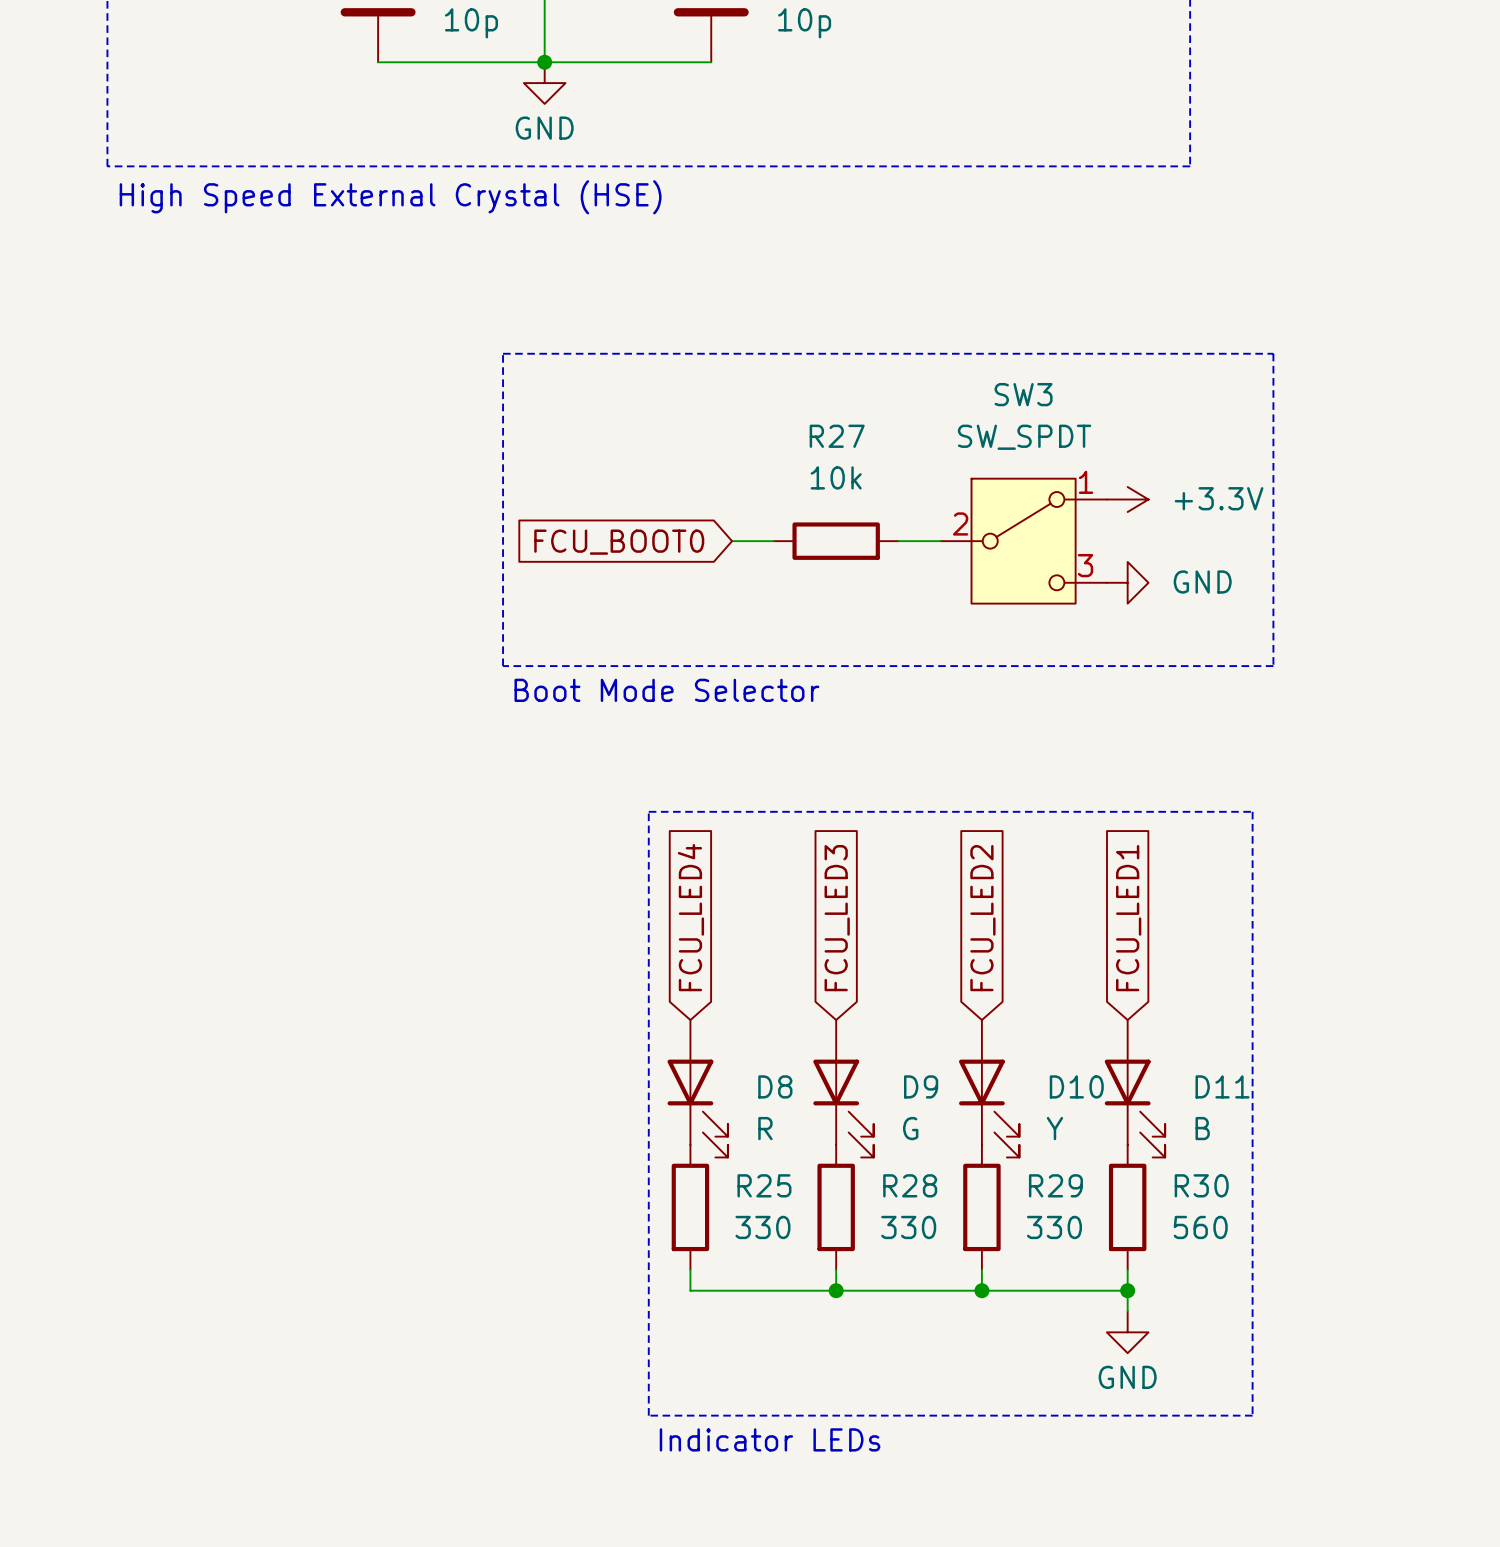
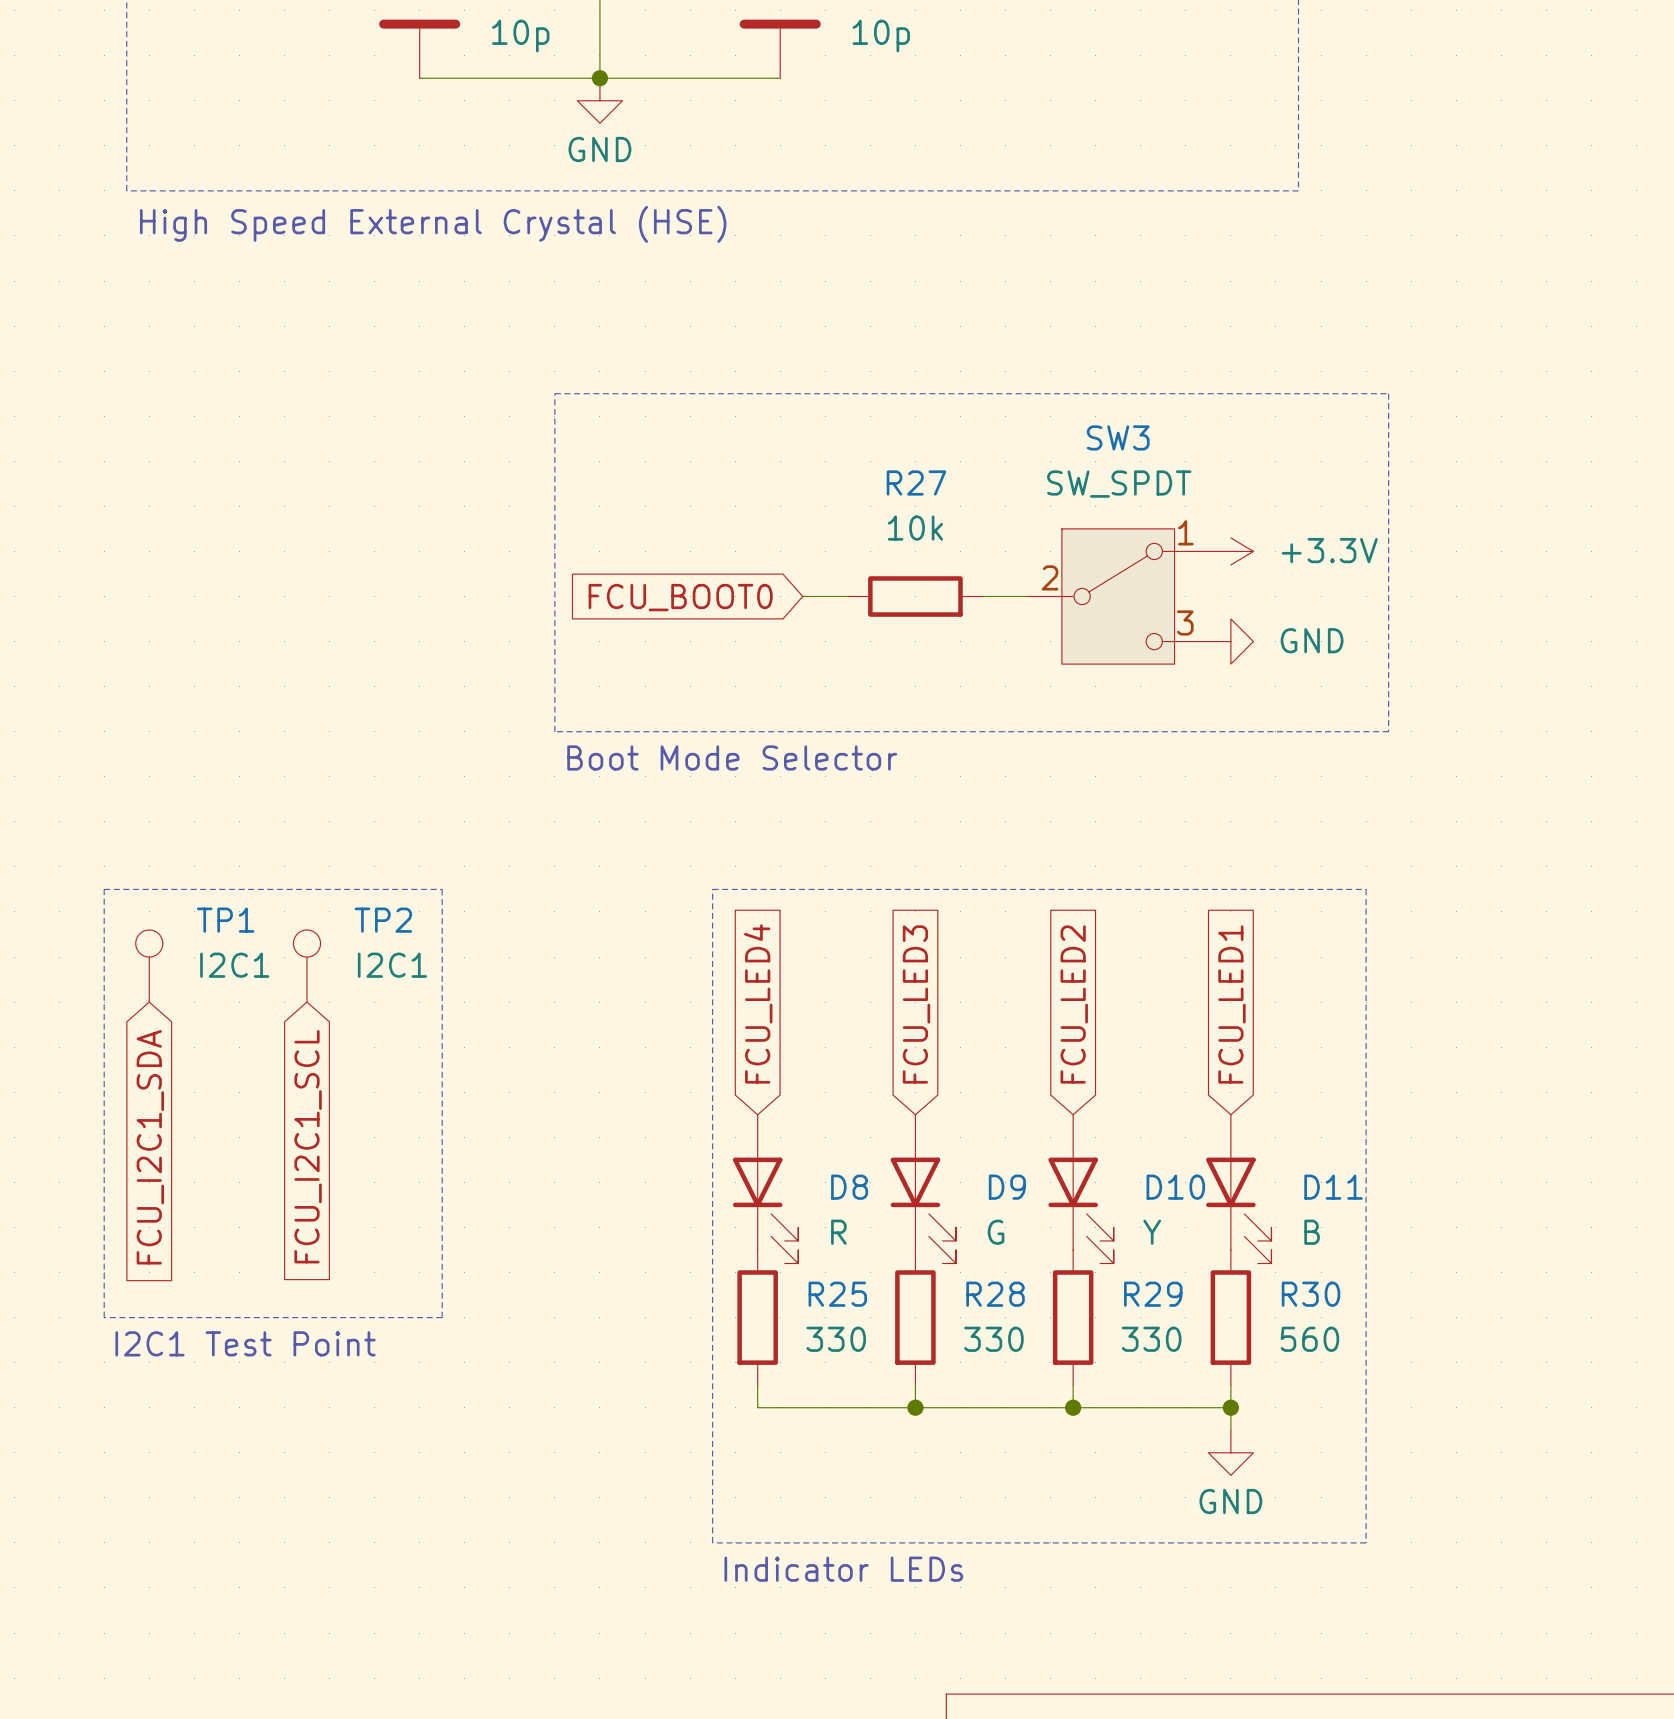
line: none -> (104, 889) (442, 889) (442, 1317) (104, 1317) (104, 889)
TP1: none -> I2C1 (149, 966)
TP2: none -> I2C1 (307, 966)
global label: none -> FCU_I2C1_SCL (308, 1146)
global label: none -> FCU_I2C1_SDA (150, 1147)
text: none -> I2C1 Test Point (245, 1343)

